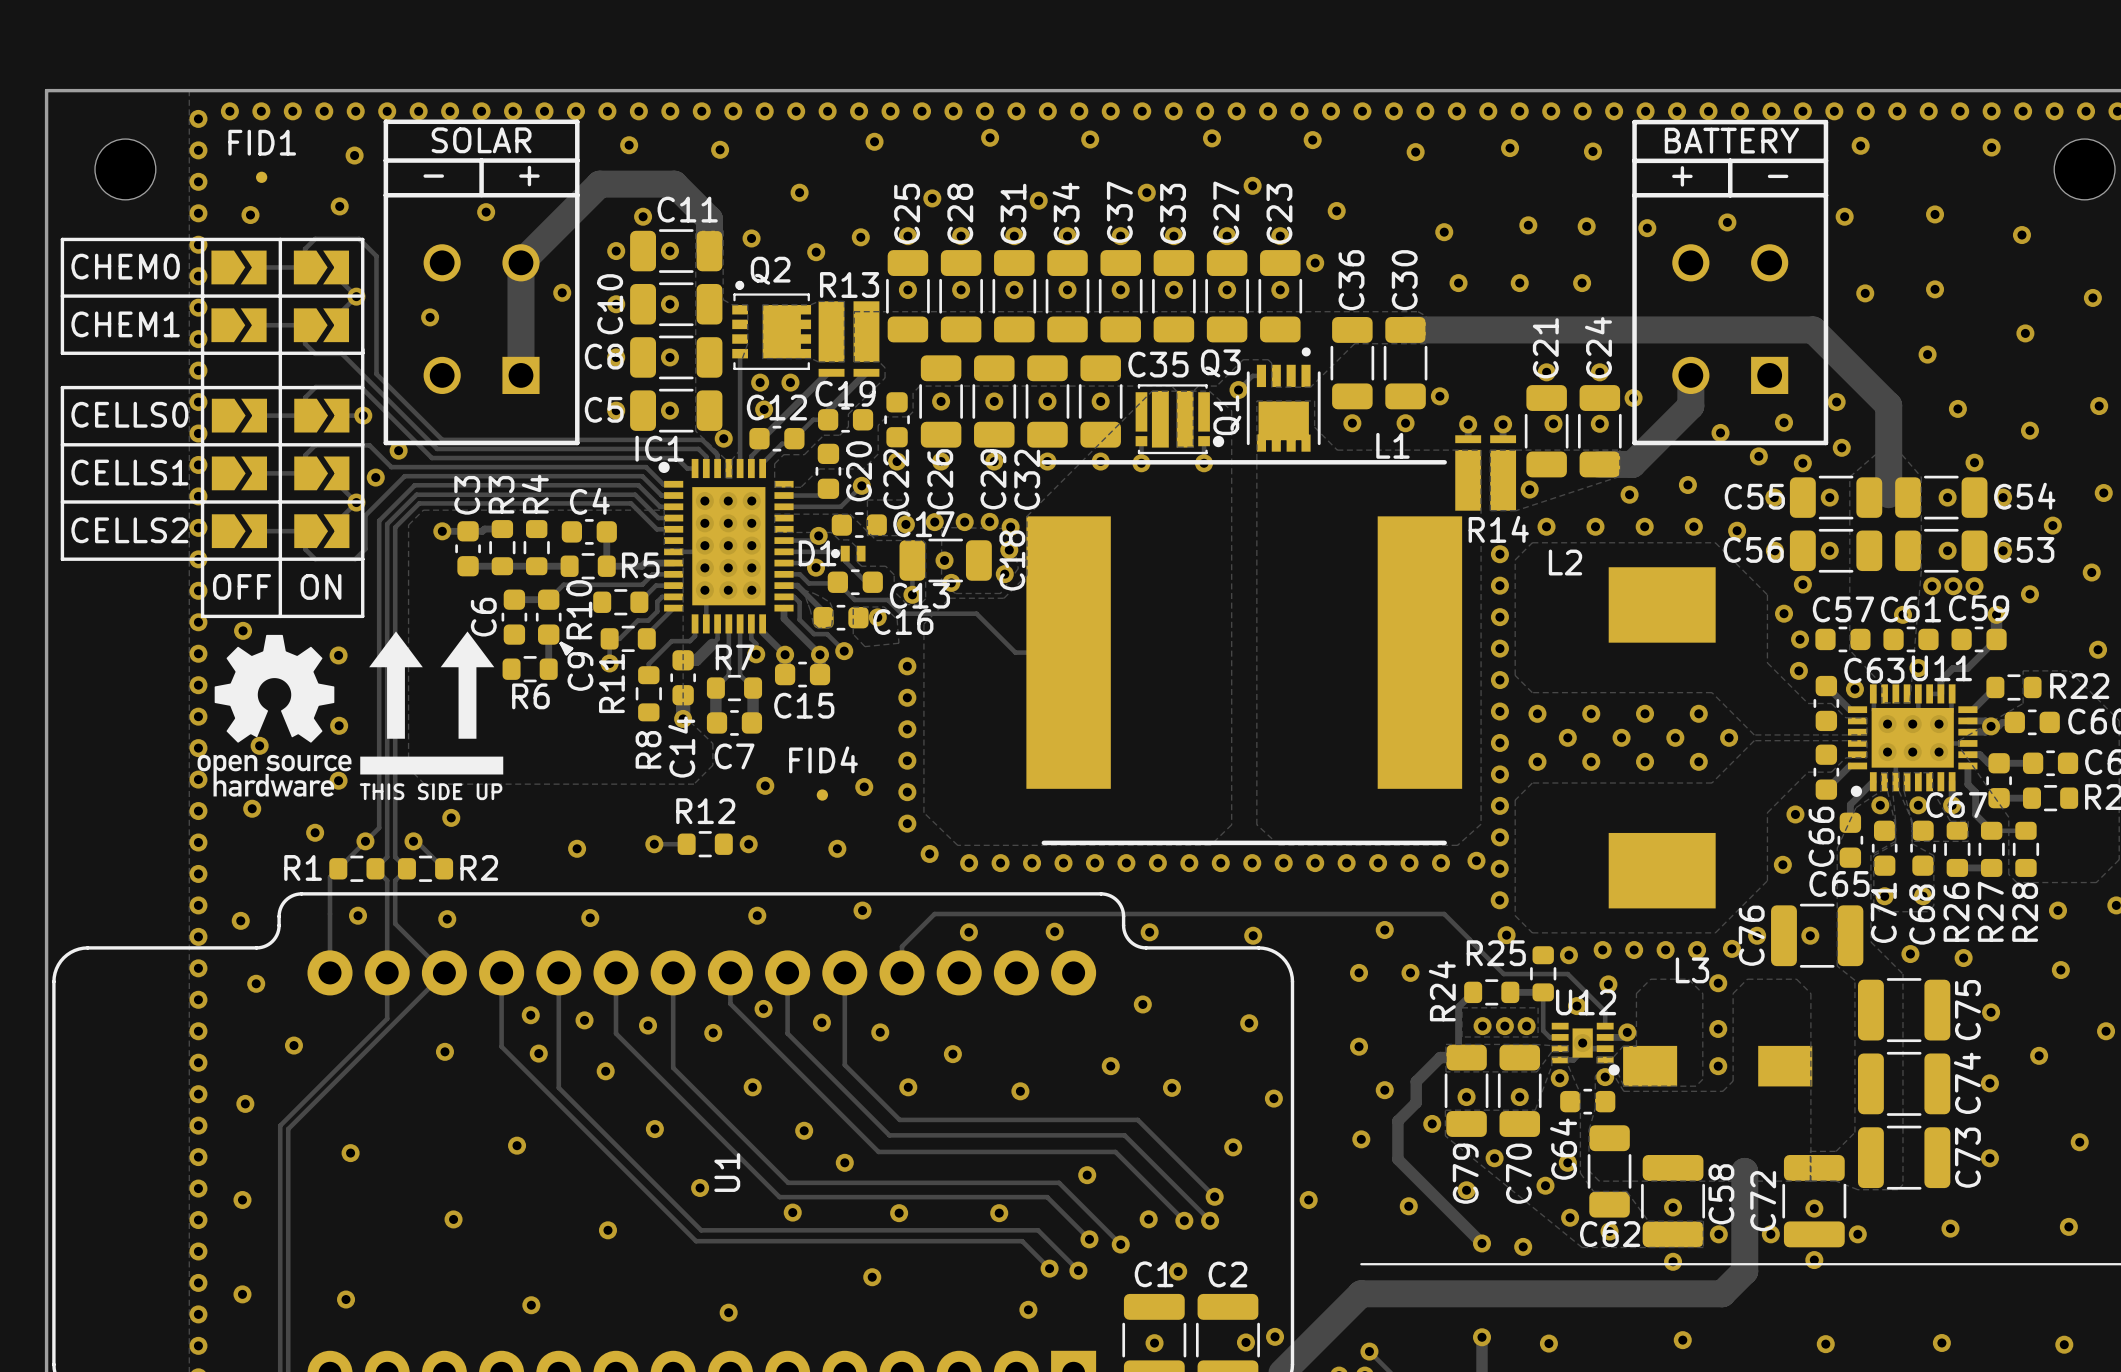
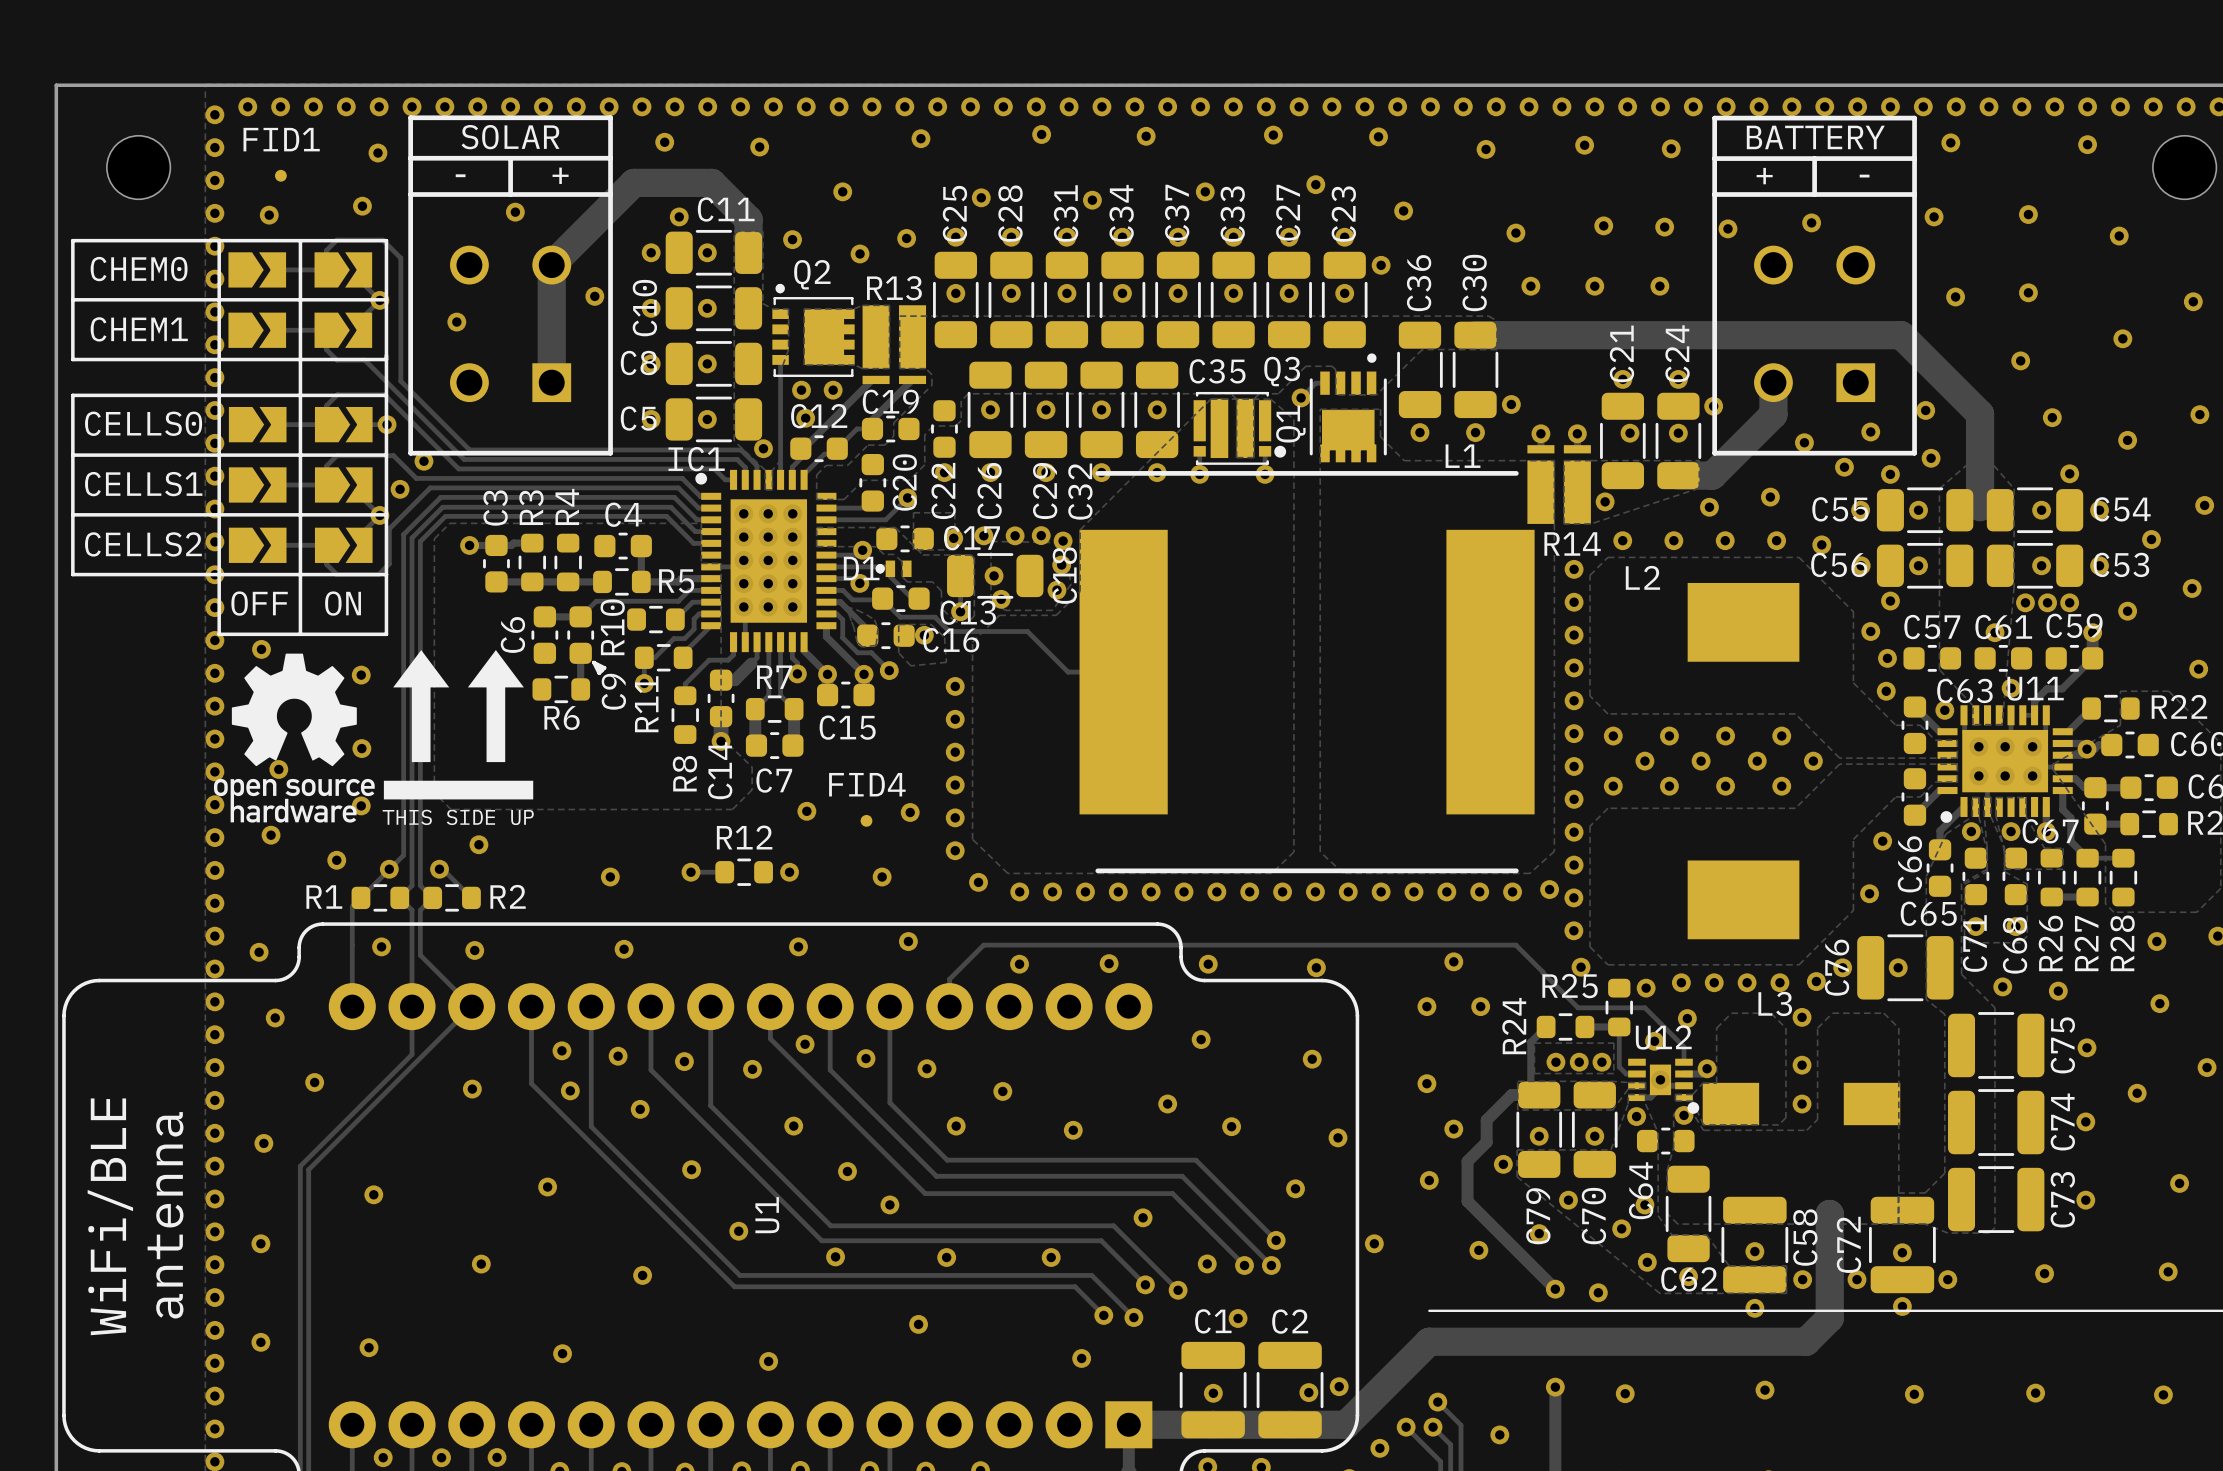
text: none -> WiFi/BLE (110, 1216)
text: none -> antenna (165, 1215)

